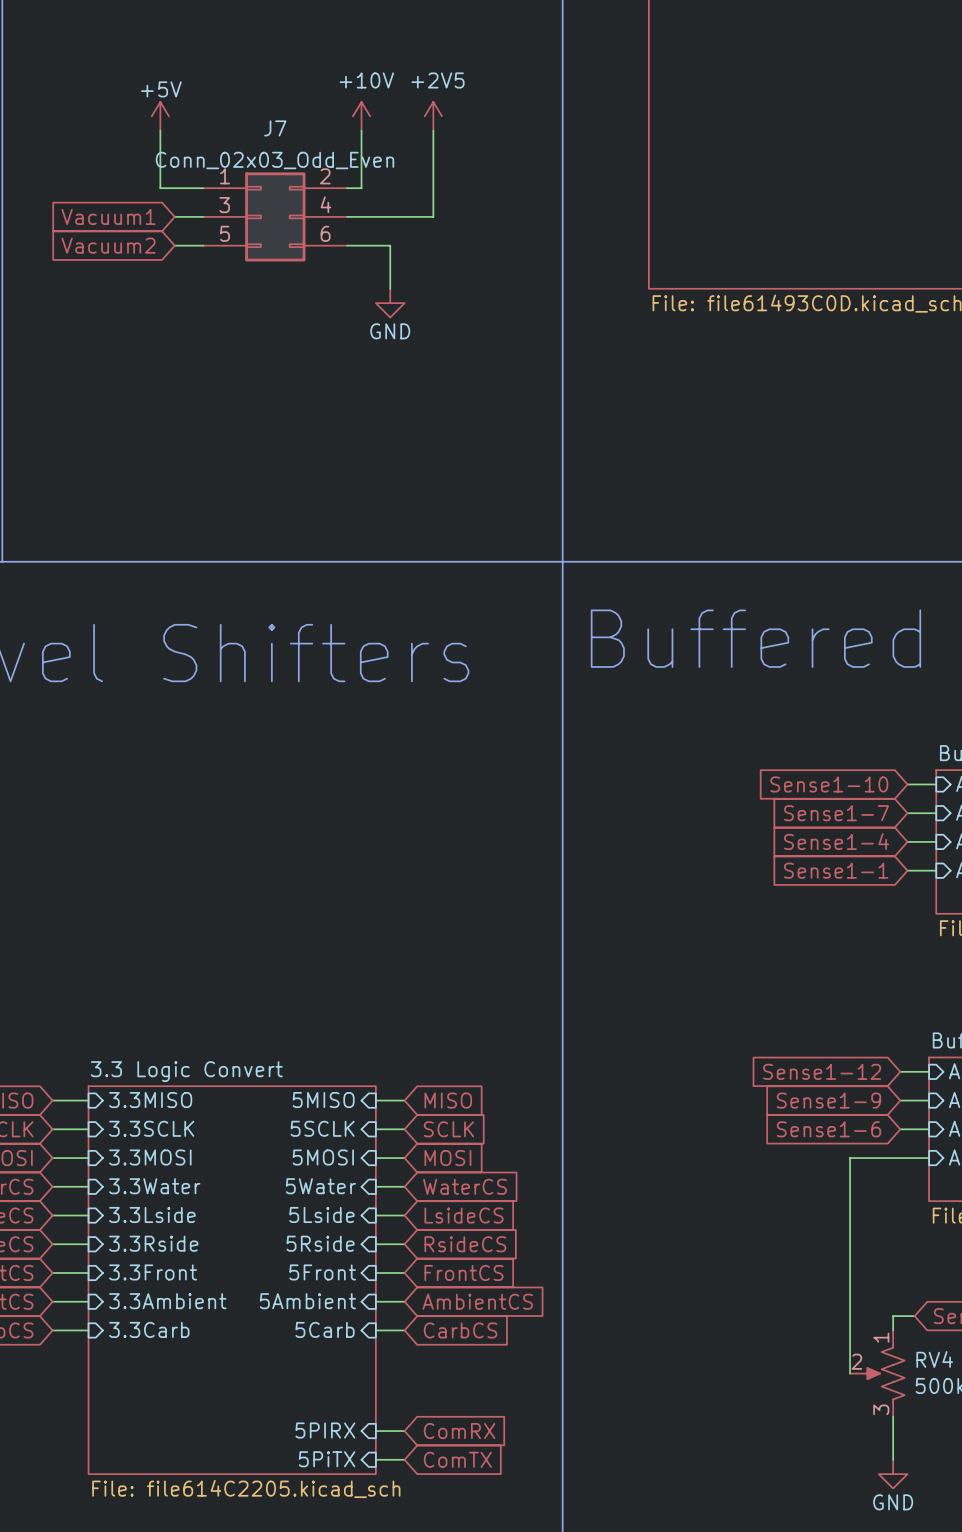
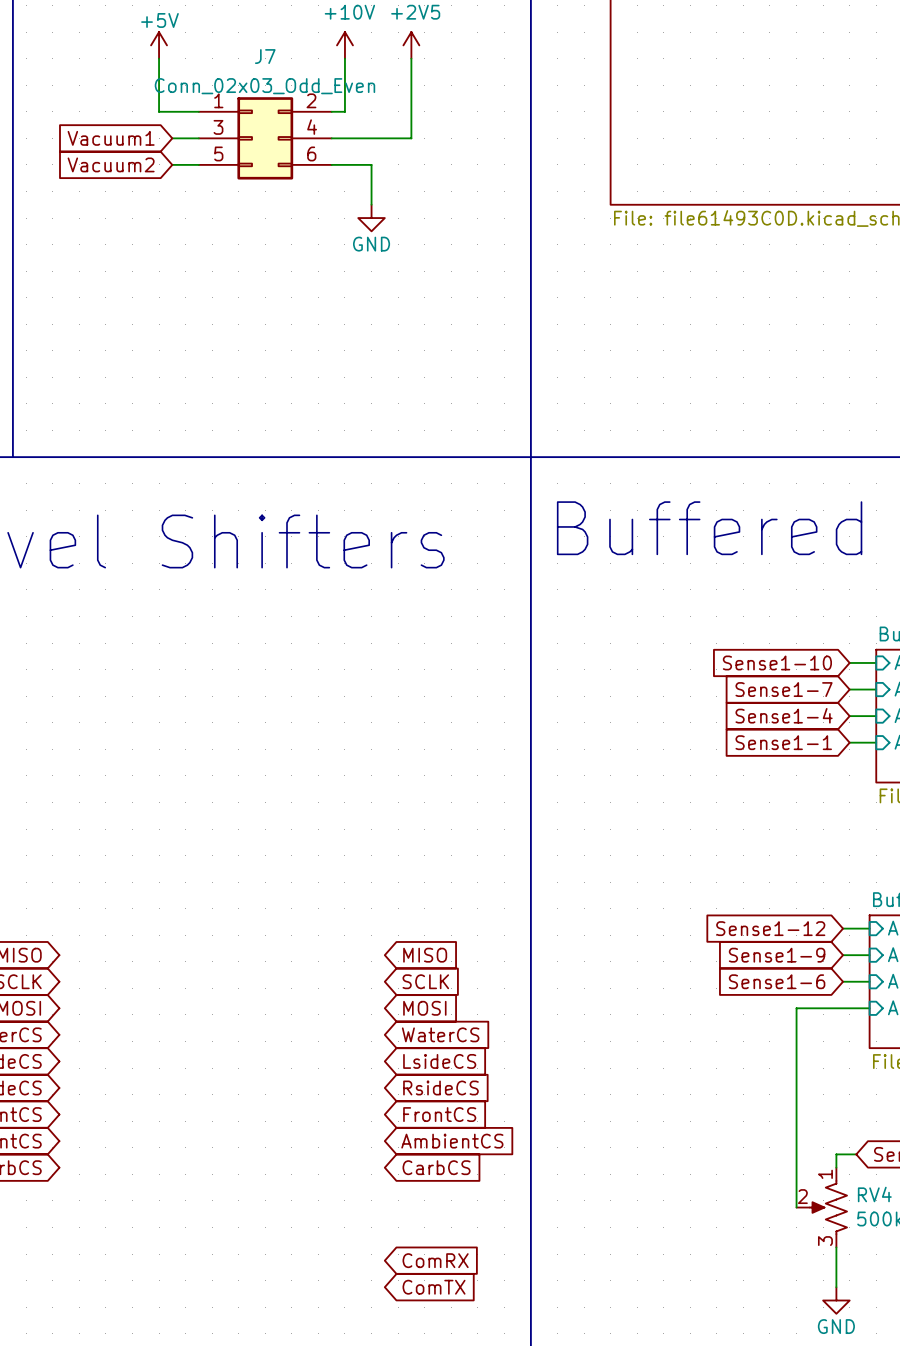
wire: (52, 1100) (88, 1100) -> none
sheet pin: 3.3MISO (150, 1100) -> none
sheet pin: 5MISO (323, 1100) -> none
wire: (375, 1100) (404, 1100) -> none
sheet pin: 3.3SCLK (151, 1128) -> none
sheet pin: 5SCLK (322, 1128) -> none
wire: (52, 1129) (88, 1129) -> none
wire: (375, 1129) (404, 1129) -> none
sheet pin: 3.3MOSI (150, 1157) -> none
sheet pin: 5MOSI (323, 1157) -> none
wire: (52, 1158) (88, 1158) -> none
wire: (375, 1158) (404, 1158) -> none
wire: (52, 1186) (88, 1186) -> none
sheet pin: 3.3Water (154, 1186) -> none
sheet pin: 5Water (320, 1186) -> none
wire: (375, 1186) (404, 1186) -> none
sheet pin: 3.3Lside (152, 1214) -> none
sheet pin: 5Lside (321, 1214) -> none
wire: (52, 1215) (88, 1215) -> none
wire: (375, 1215) (404, 1215) -> none
sheet pin: 3.3Rside (153, 1243) -> none
sheet pin: 5Rside (320, 1243) -> none
wire: (52, 1244) (88, 1244) -> none
wire: (375, 1244) (404, 1244) -> none
wire: (52, 1272) (88, 1272) -> none
sheet pin: 3.3Front (153, 1272) -> none
sheet pin: 5Front (322, 1272) -> none
wire: (375, 1272) (404, 1272) -> none
sheet 3.3 Logic Convert: File: file614C2205.kicad_sch (232, 1280) -> none
wire: (52, 1301) (88, 1301) -> none
sheet pin: 3.3Ambient (167, 1301) -> none
sheet pin: 5Ambient (307, 1301) -> none
wire: (375, 1301) (404, 1301) -> none
sheet pin: 3.3Carb (149, 1329) -> none
sheet pin: 5Carb (325, 1329) -> none
wire: (52, 1330) (88, 1330) -> none
wire: (375, 1330) (404, 1330) -> none
sheet pin: 5PIRX (325, 1430) -> none
wire: (375, 1431) (404, 1431) -> none
sheet pin: 5PiTX (327, 1459) -> none
wire: (375, 1459) (404, 1459) -> none

